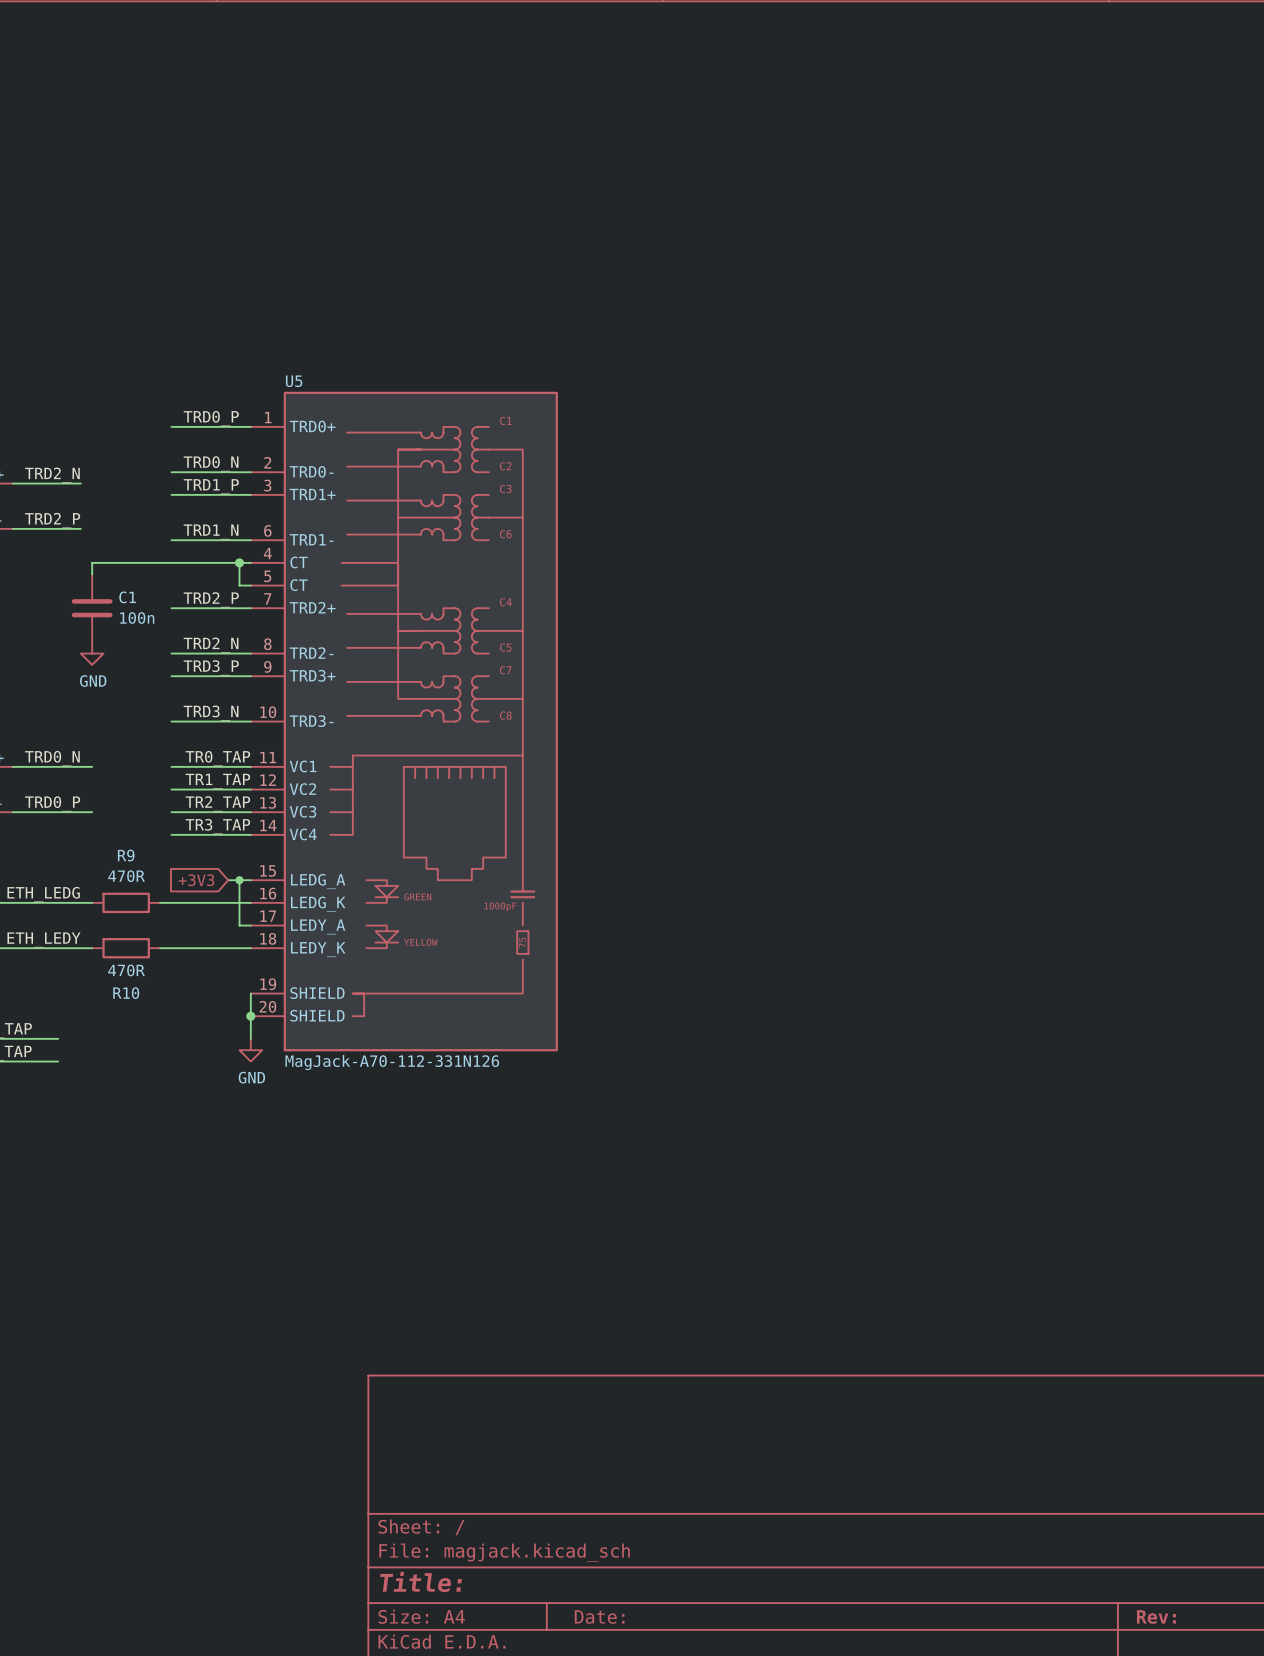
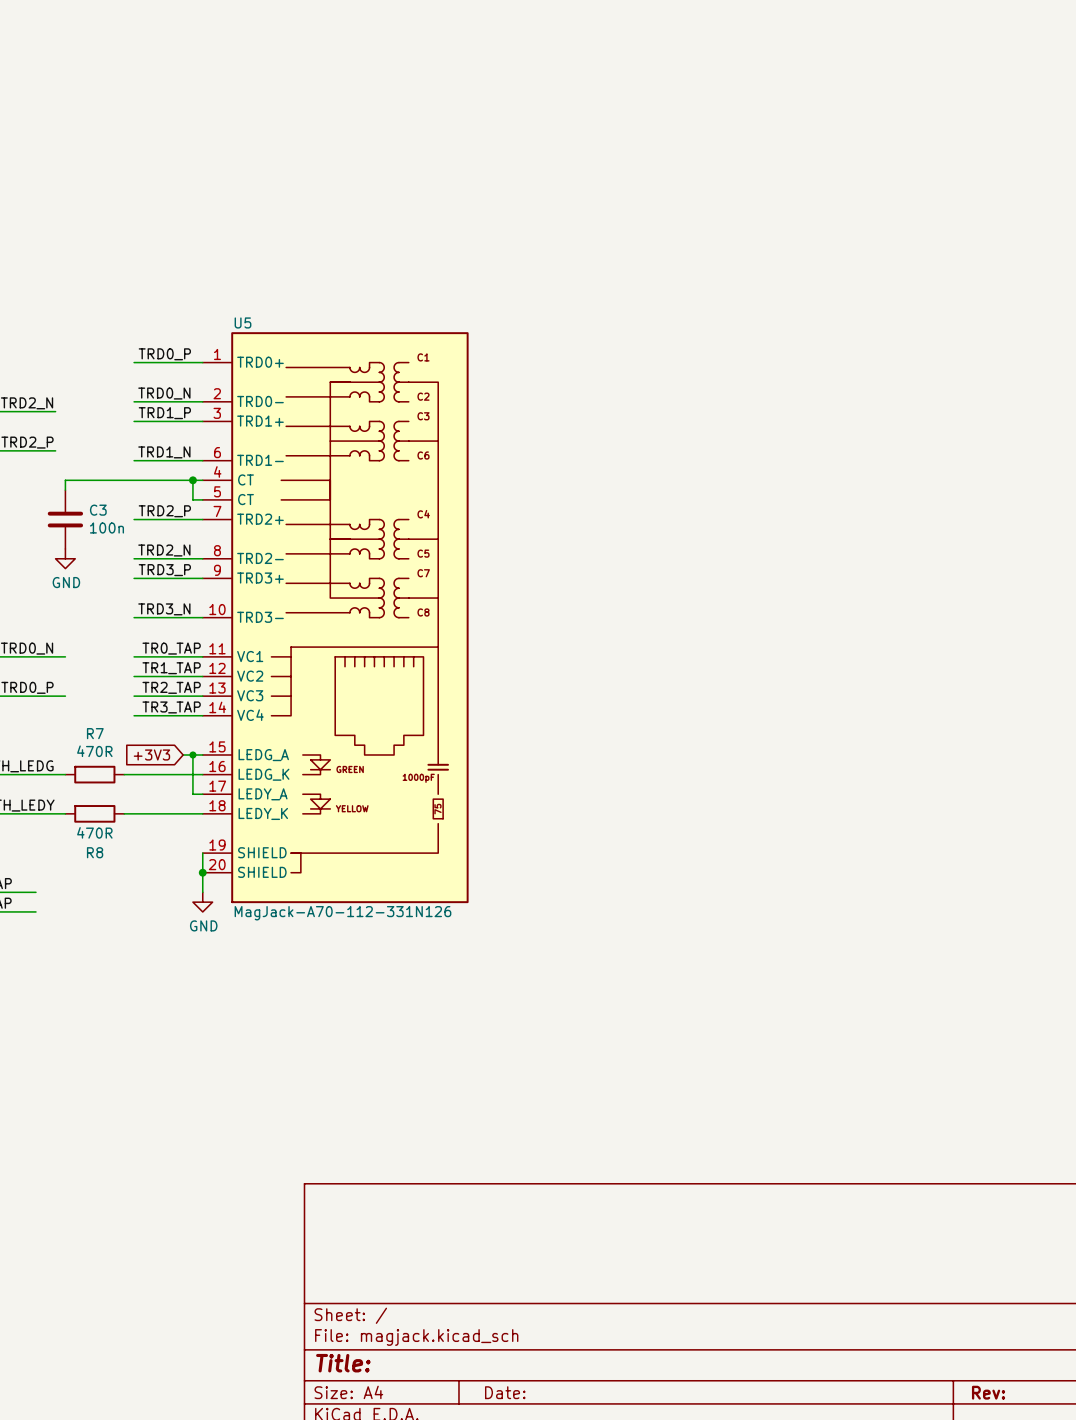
C1 name: C1 (127, 597) -> C3 (98, 510)
R9 name: R9 (126, 855) -> R7 (95, 733)
R10 name: R10 (126, 993) -> R8 (95, 852)

